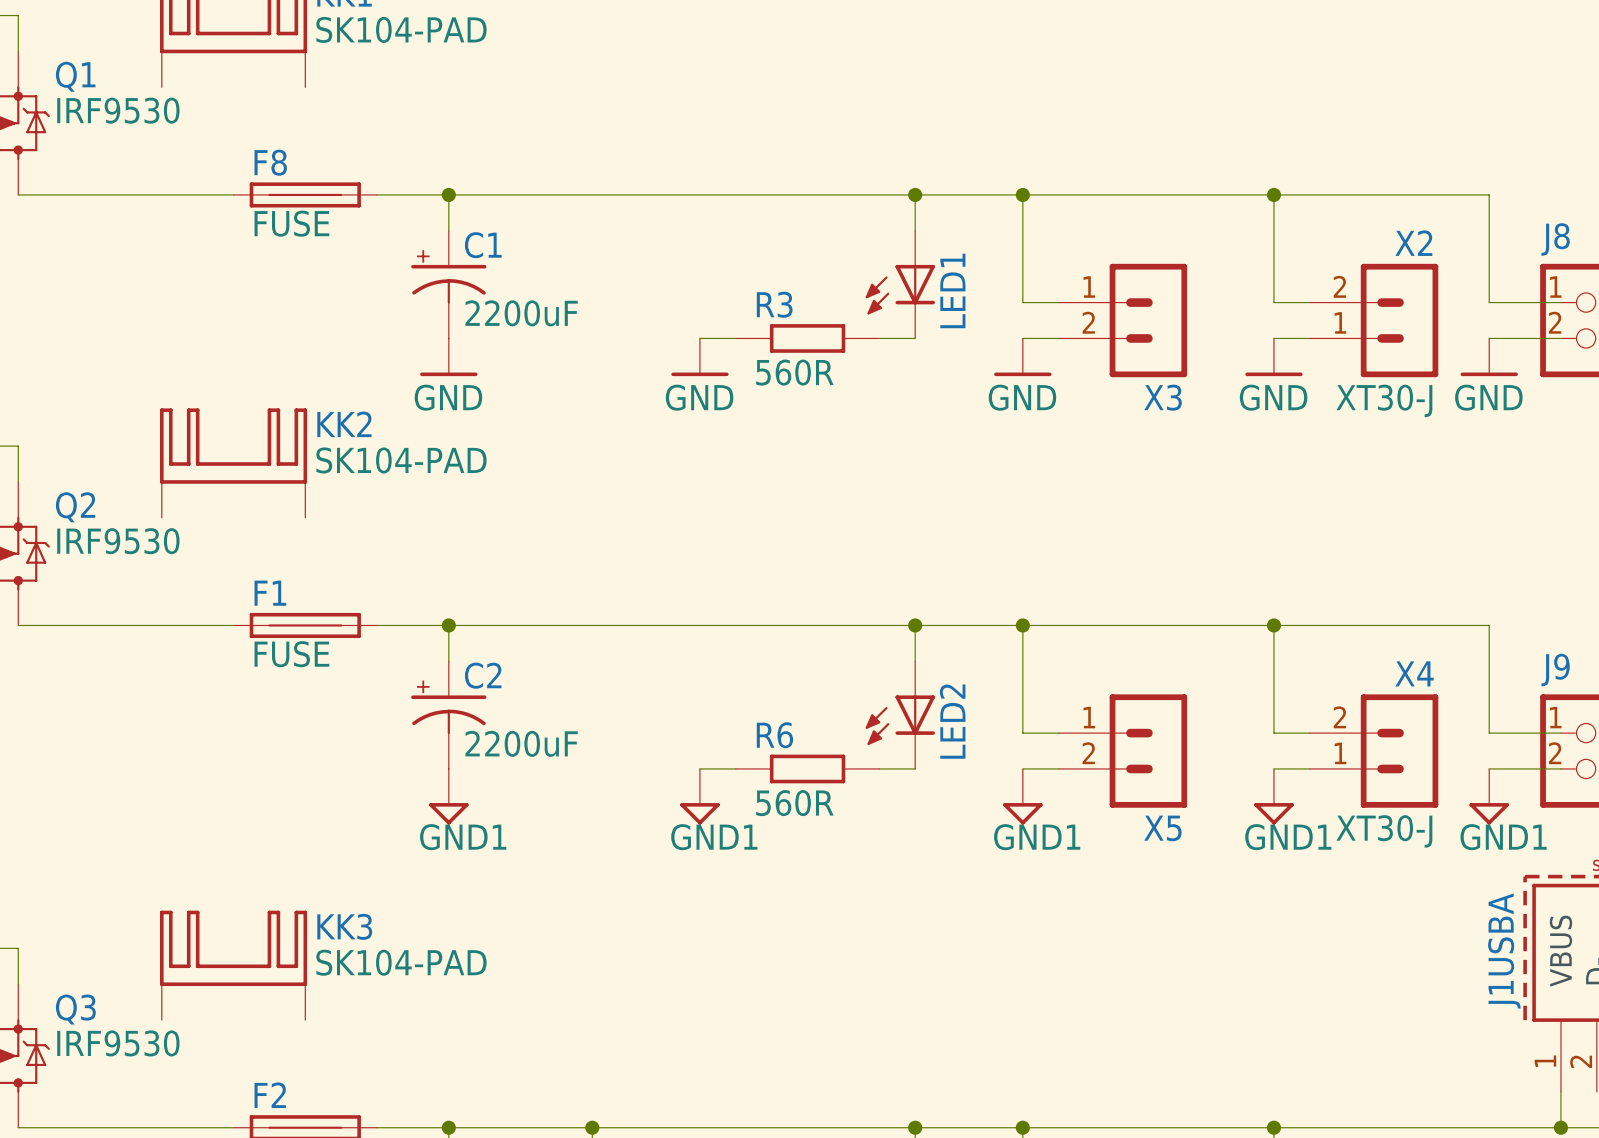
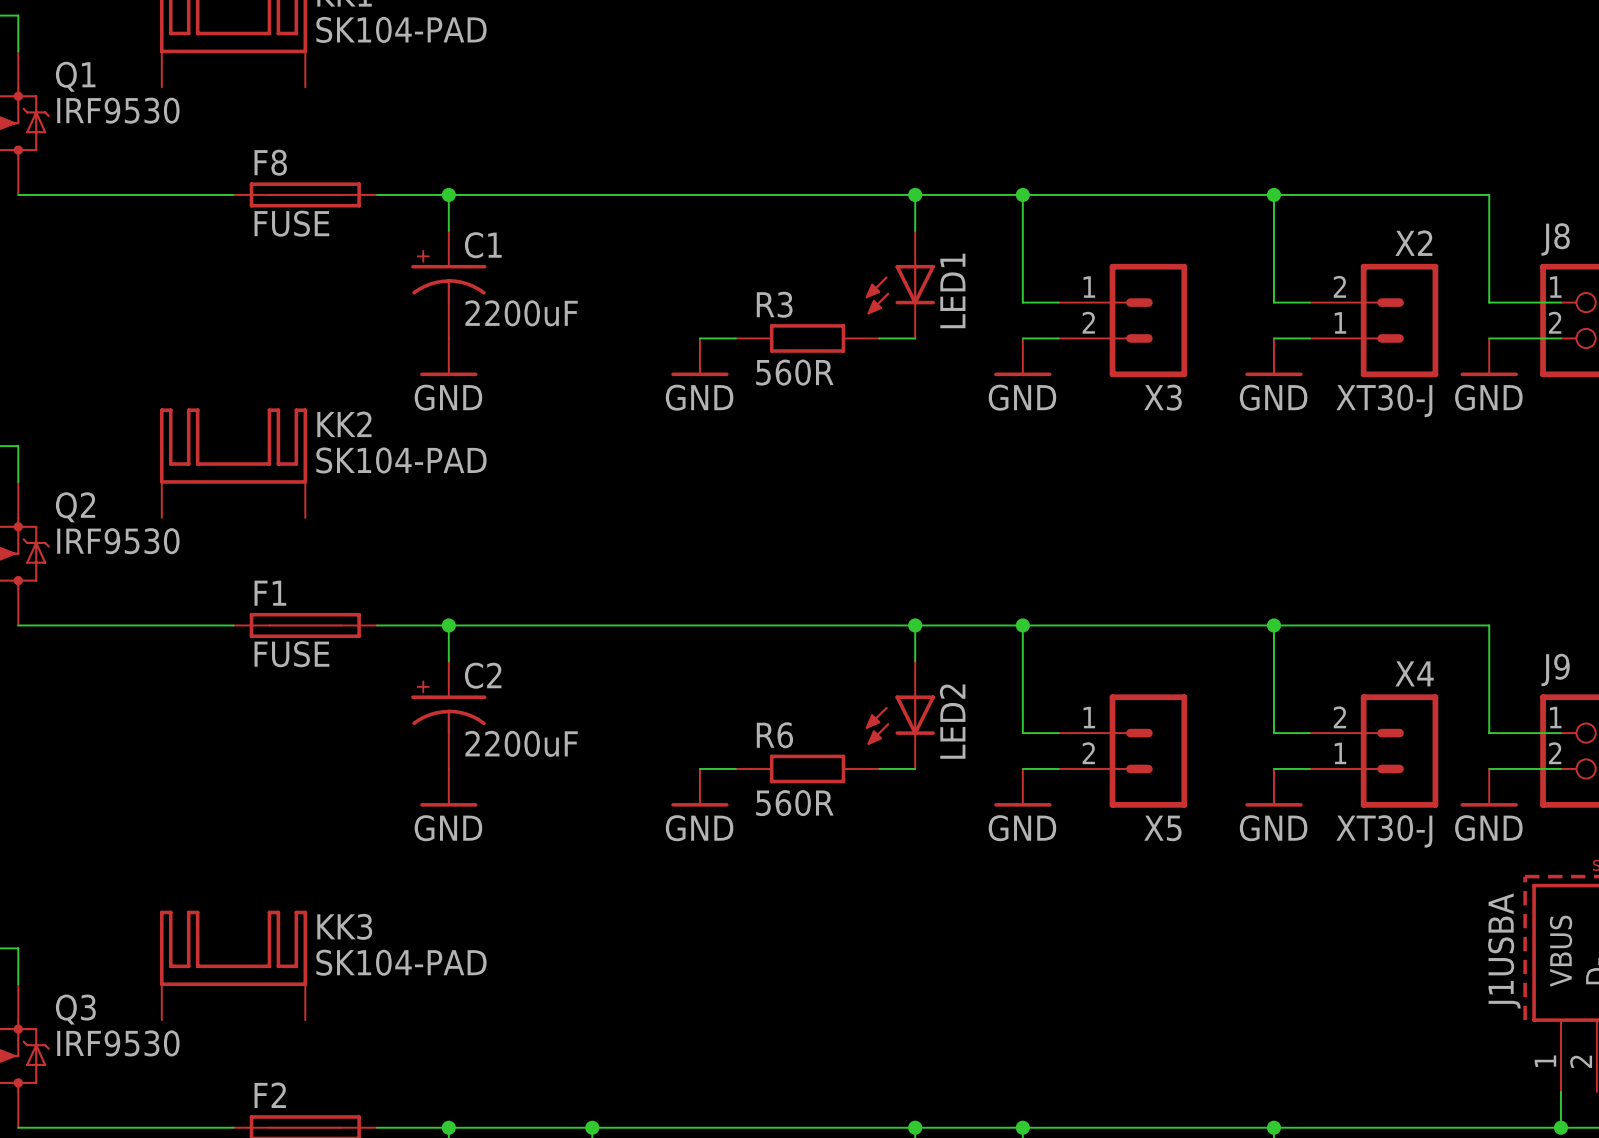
power symbol: GND1 (448, 796) -> GND (448, 787)
power symbol: GND1 (699, 796) -> GND (699, 787)
power symbol: GND1 (1022, 796) -> GND (1022, 787)
power symbol: GND1 (1273, 796) -> GND (1273, 787)
power symbol: GND1 (1489, 796) -> GND (1489, 787)

